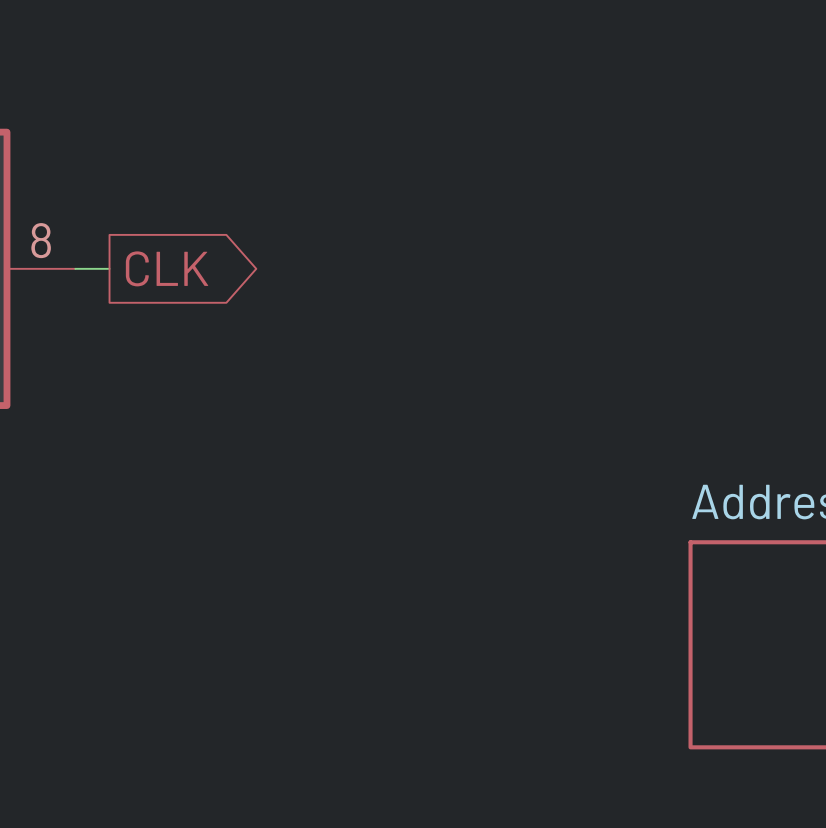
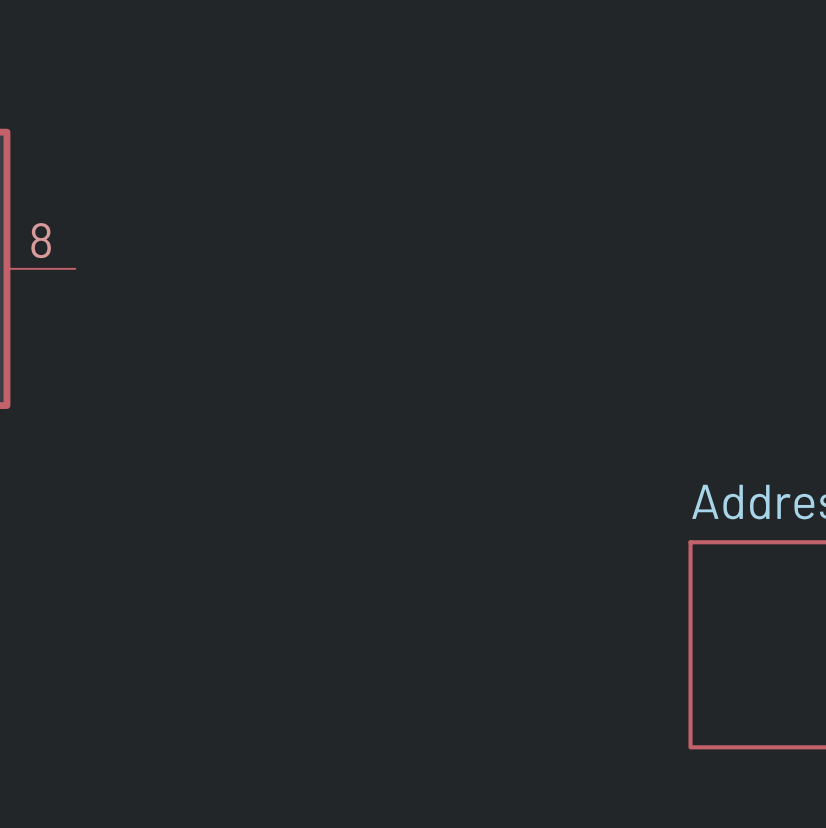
wire: (75, 268) (109, 268) -> none
global label: CLK (167, 268) -> none

